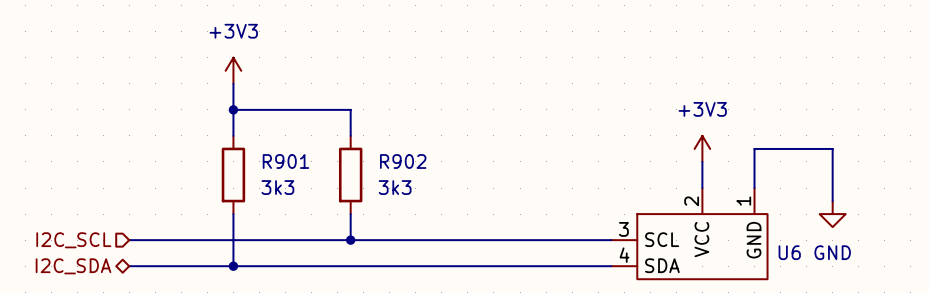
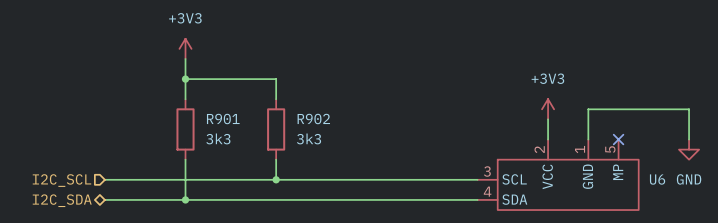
wire: (832, 148) (832, 201) -> (648, 109) (689, 109) (689, 139)
U6 symbol: [611, 188, 768, 280] -> [477, 139, 639, 211]
no-connect mark: none -> (618, 139)
power symbol position: GND (832, 214) -> GND (689, 149)
U6 name position: U6 (789, 252) -> U6 (657, 179)

